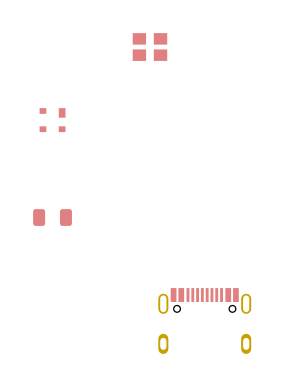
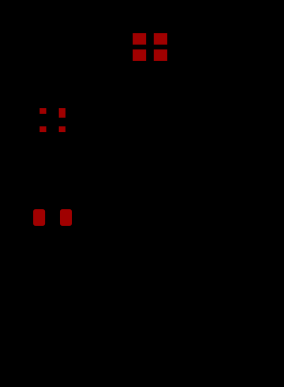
part: (204, 321) -> none

